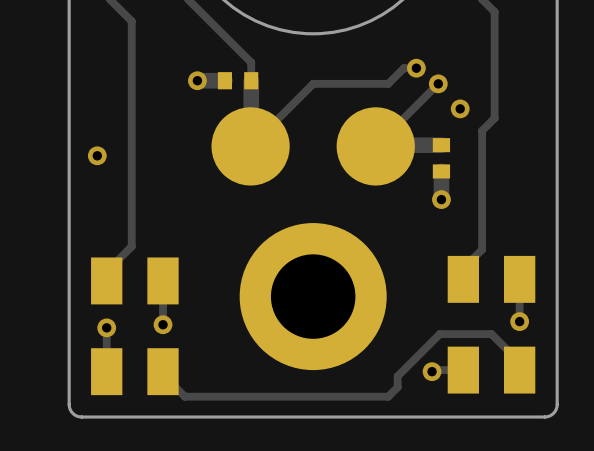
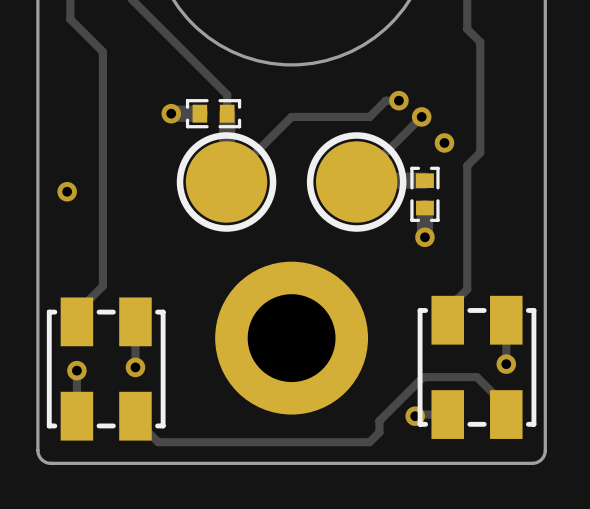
part footprint: [217, 72, 259, 90] -> [185, 99, 242, 129]
part footprint: [211, 107, 290, 186] -> [176, 132, 277, 232]
part footprint: [336, 107, 415, 186] -> [306, 132, 407, 232]
part footprint: [432, 138, 451, 179] -> [410, 166, 440, 223]
part footprint: [447, 255, 536, 394] -> [417, 295, 537, 439]
part footprint: [91, 257, 179, 396] -> [46, 297, 166, 441]

